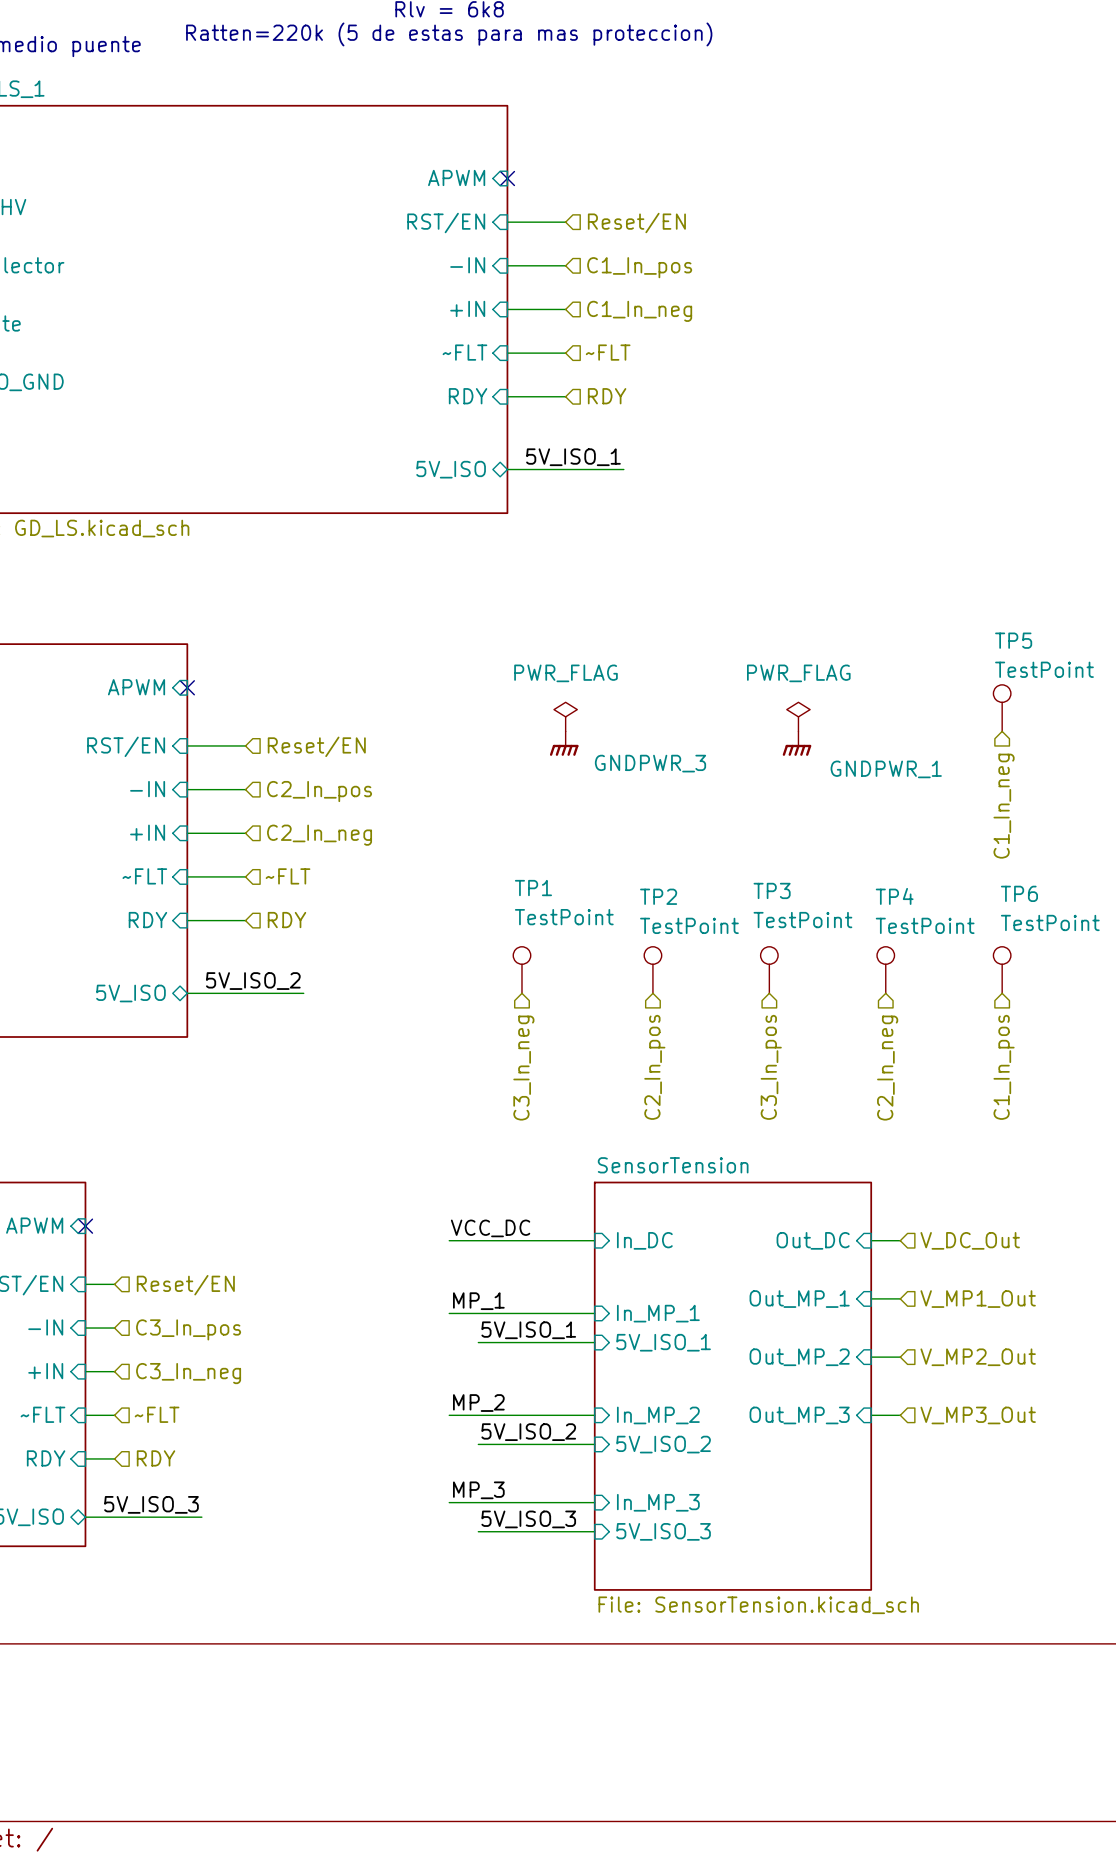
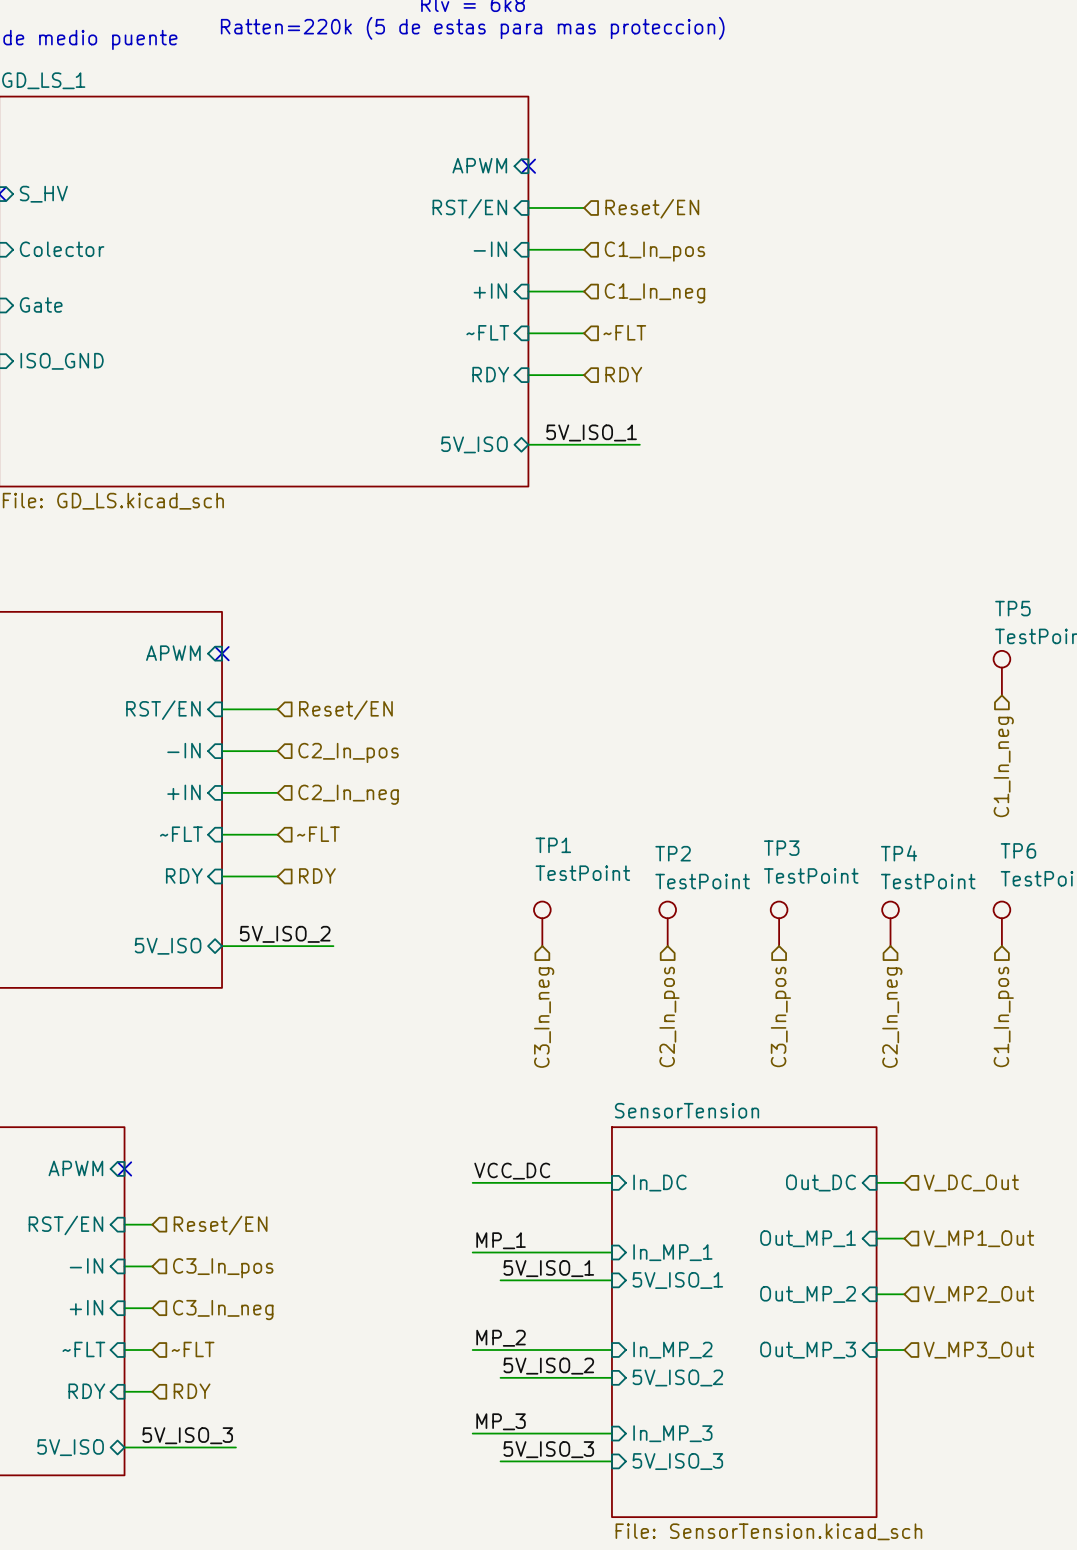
power symbol: PWR_FLAG (565, 716) -> none
power symbol: PWR_FLAG (798, 716) -> none
power symbol: GNDPWR_3 (564, 743) -> none
power symbol: GNDPWR_1 (797, 743) -> none

